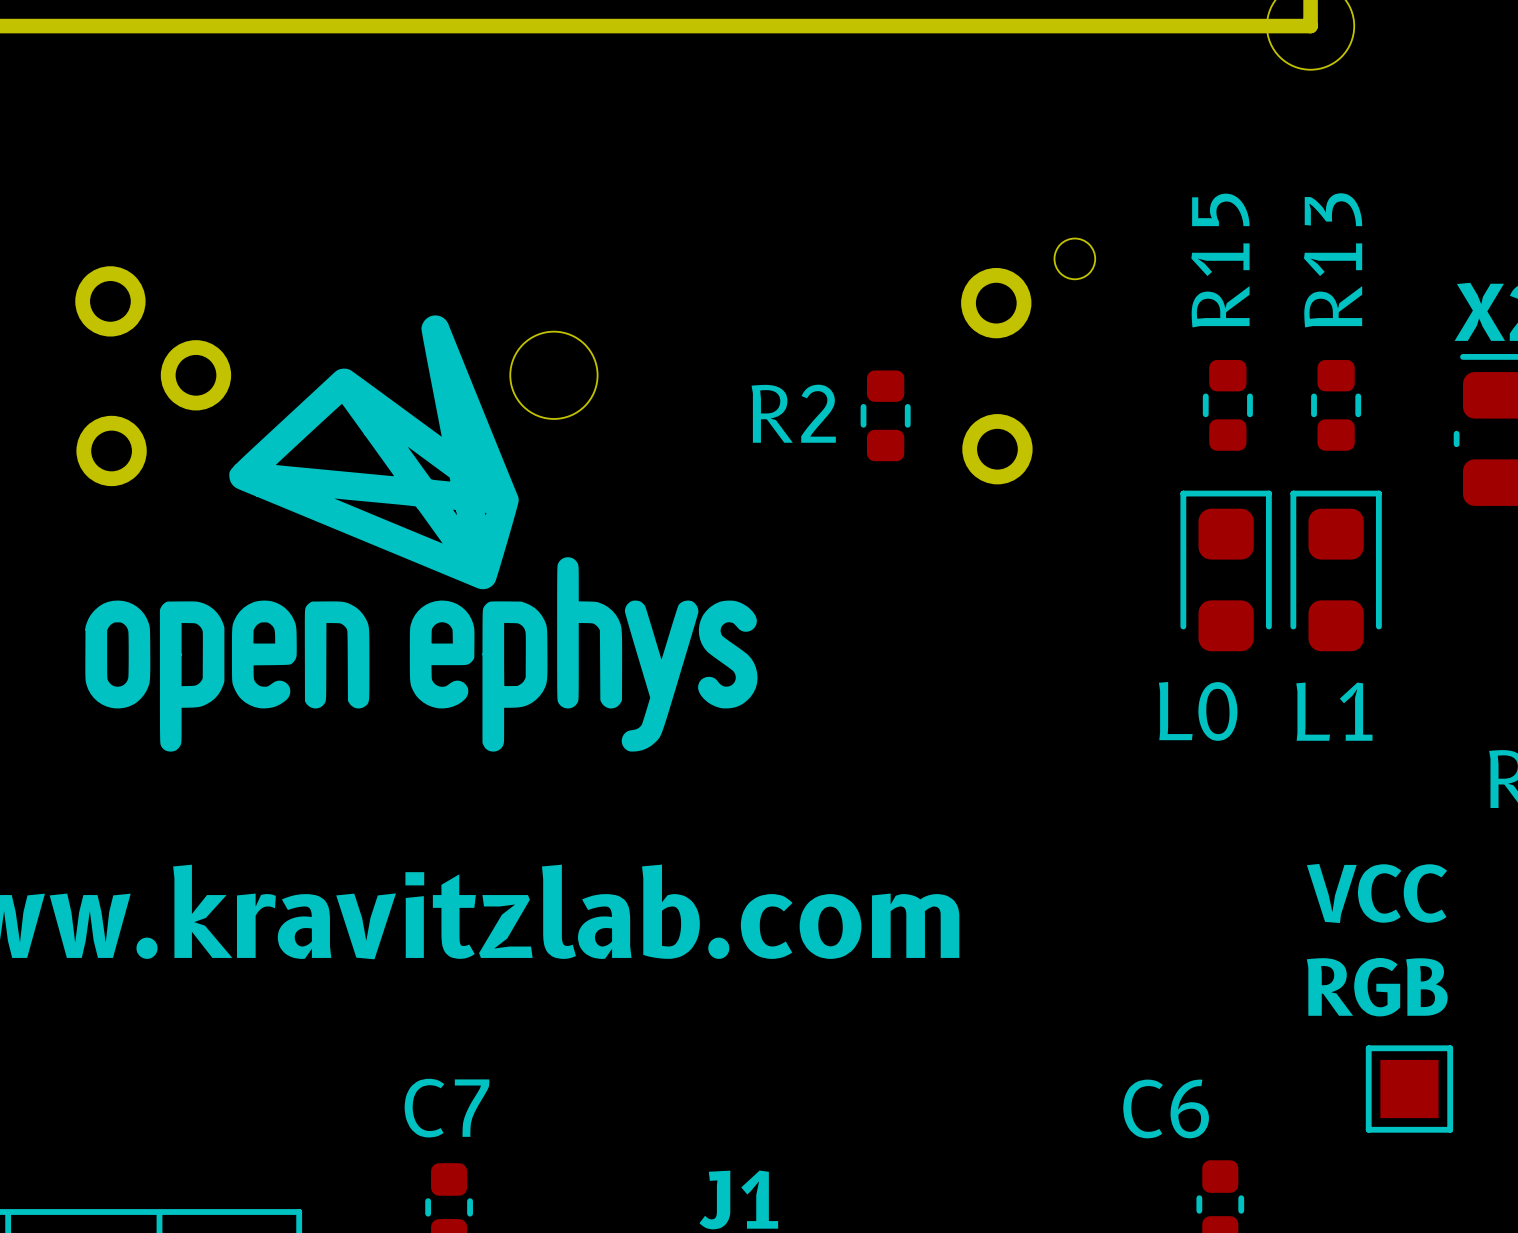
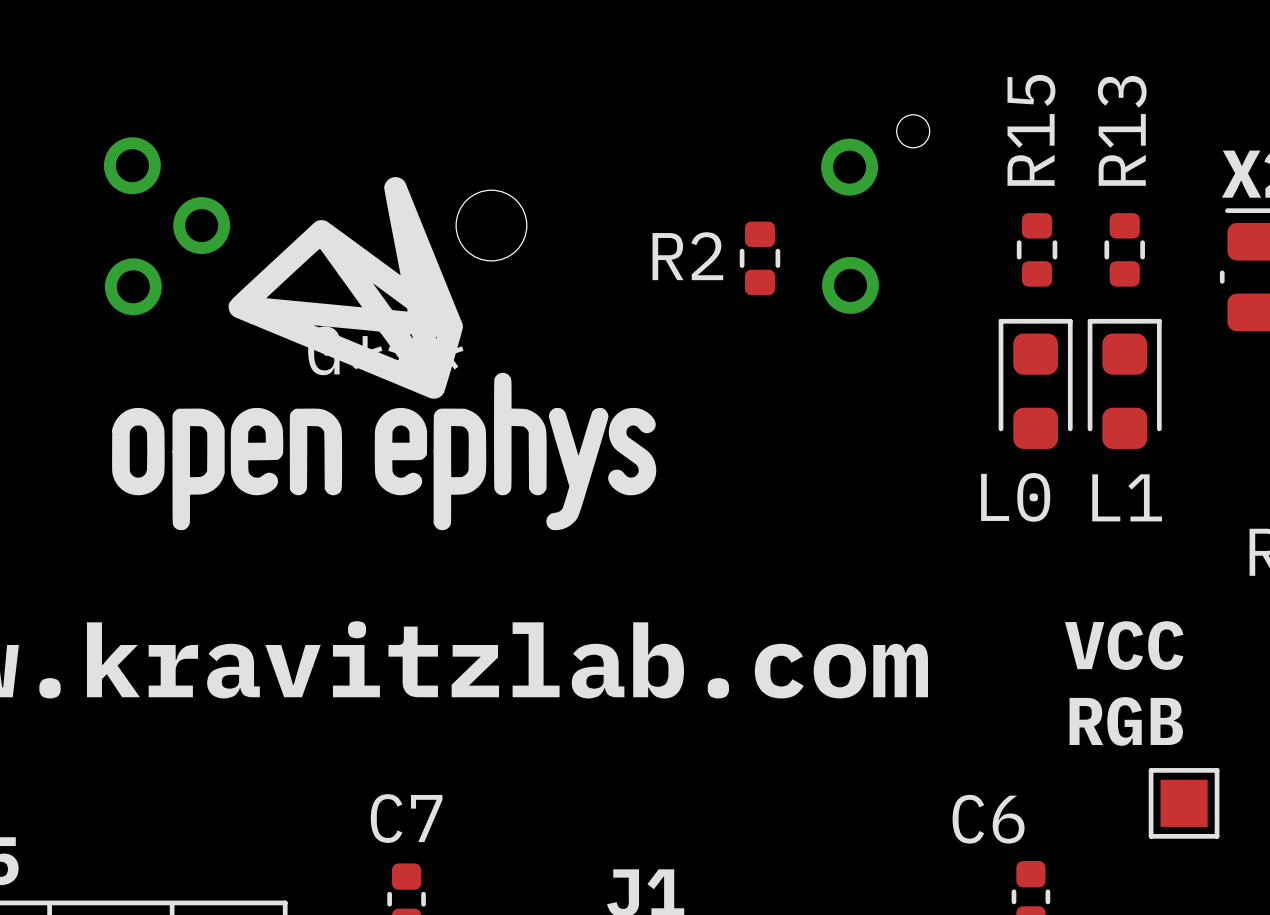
drawing: [85, 315, 758, 752] -> none
part: none -> (384, 353)
text position: VCC (1376, 893) -> VCC (1124, 645)
text position: RGB (1377, 987) -> RGB (1126, 721)

